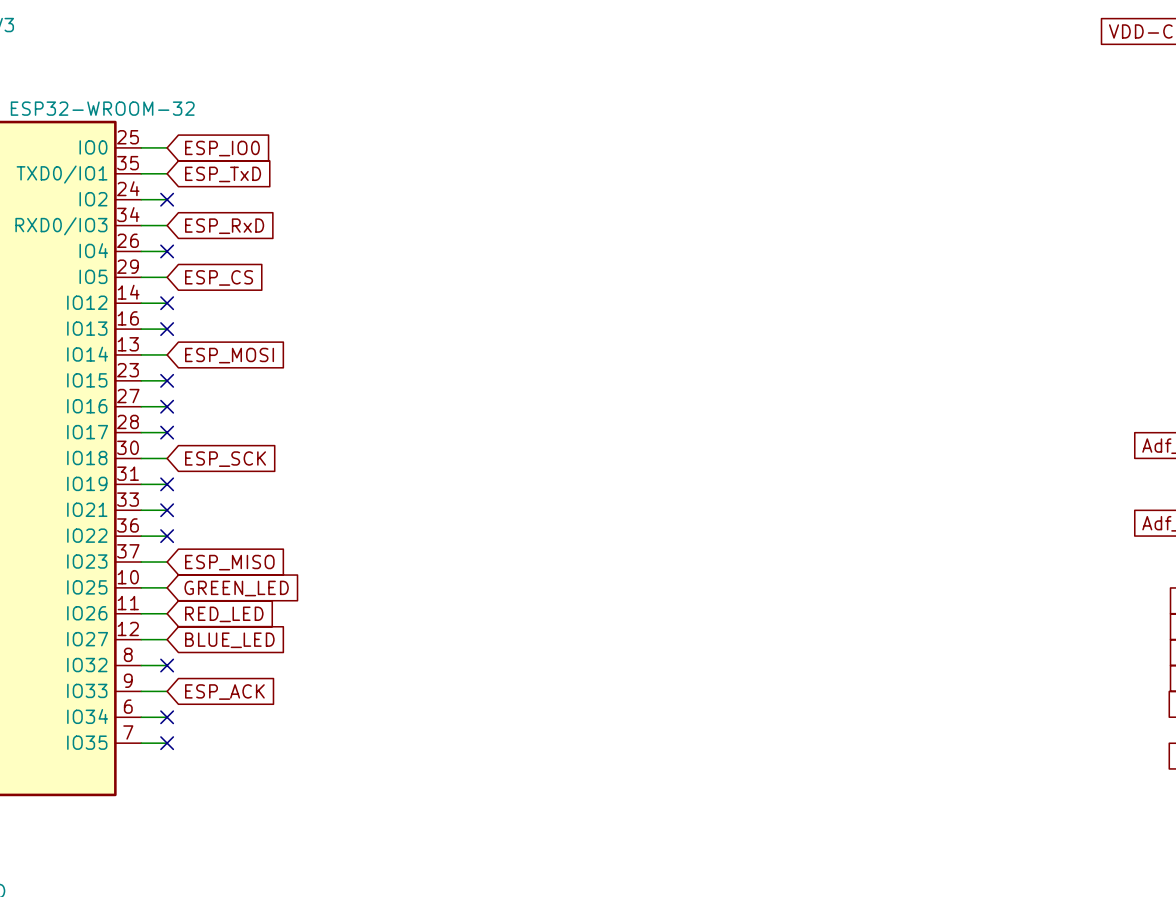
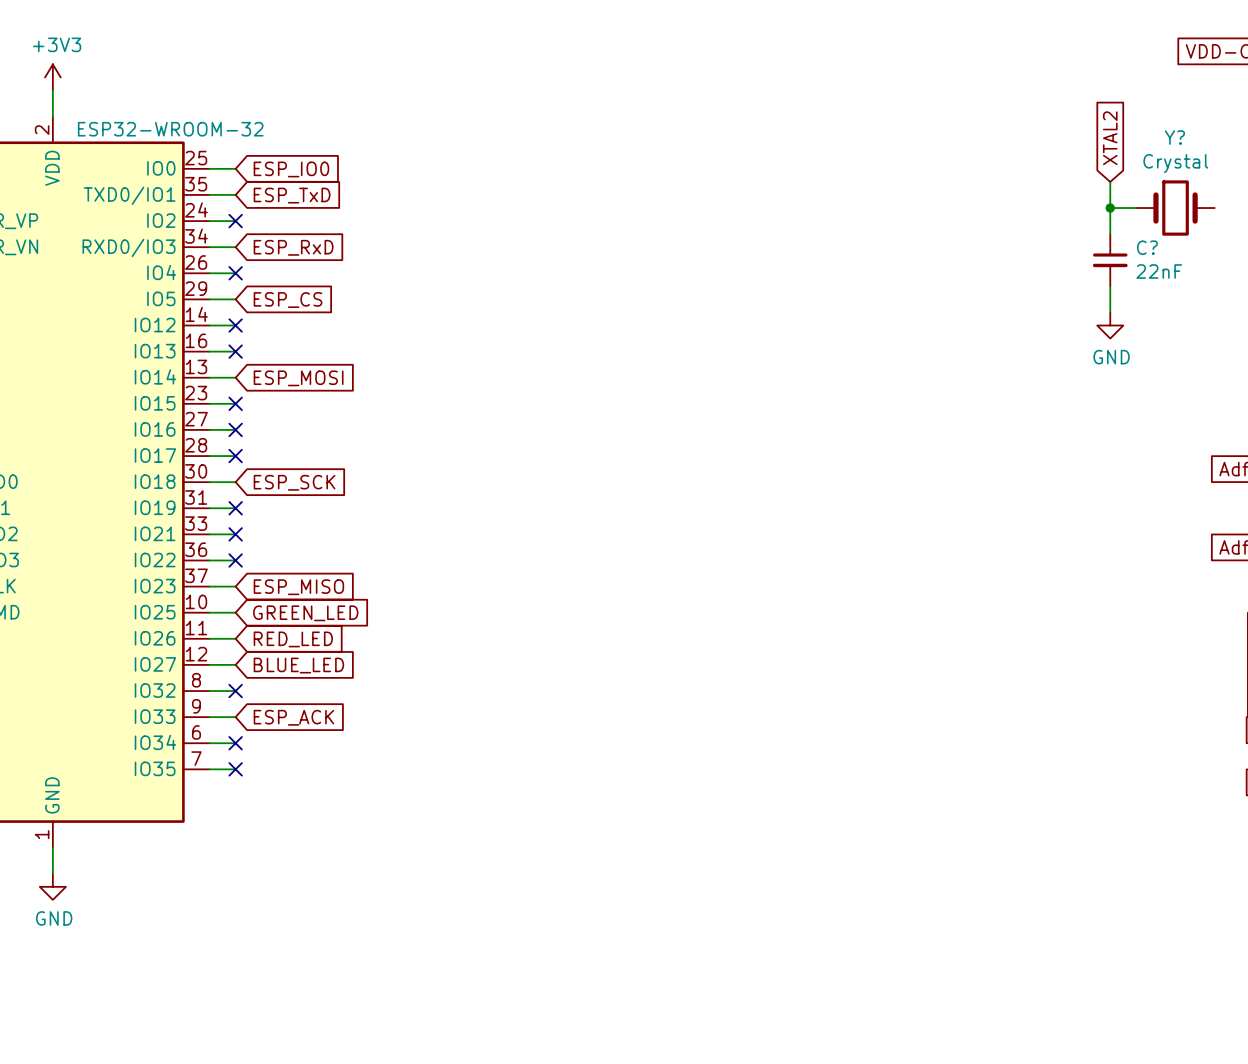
global label: none -> XTAL2 (1110, 138)
wire: none -> (1110, 181) (1110, 234)
wire: none -> (1110, 208) (1136, 208)
junction: none -> (1110, 208)
Y?: none -> Crystal (1175, 208)
C?: none -> 22nF (1110, 260)
wire: none -> (1110, 286) (1110, 312)
power symbol: none -> GND (1110, 325)

